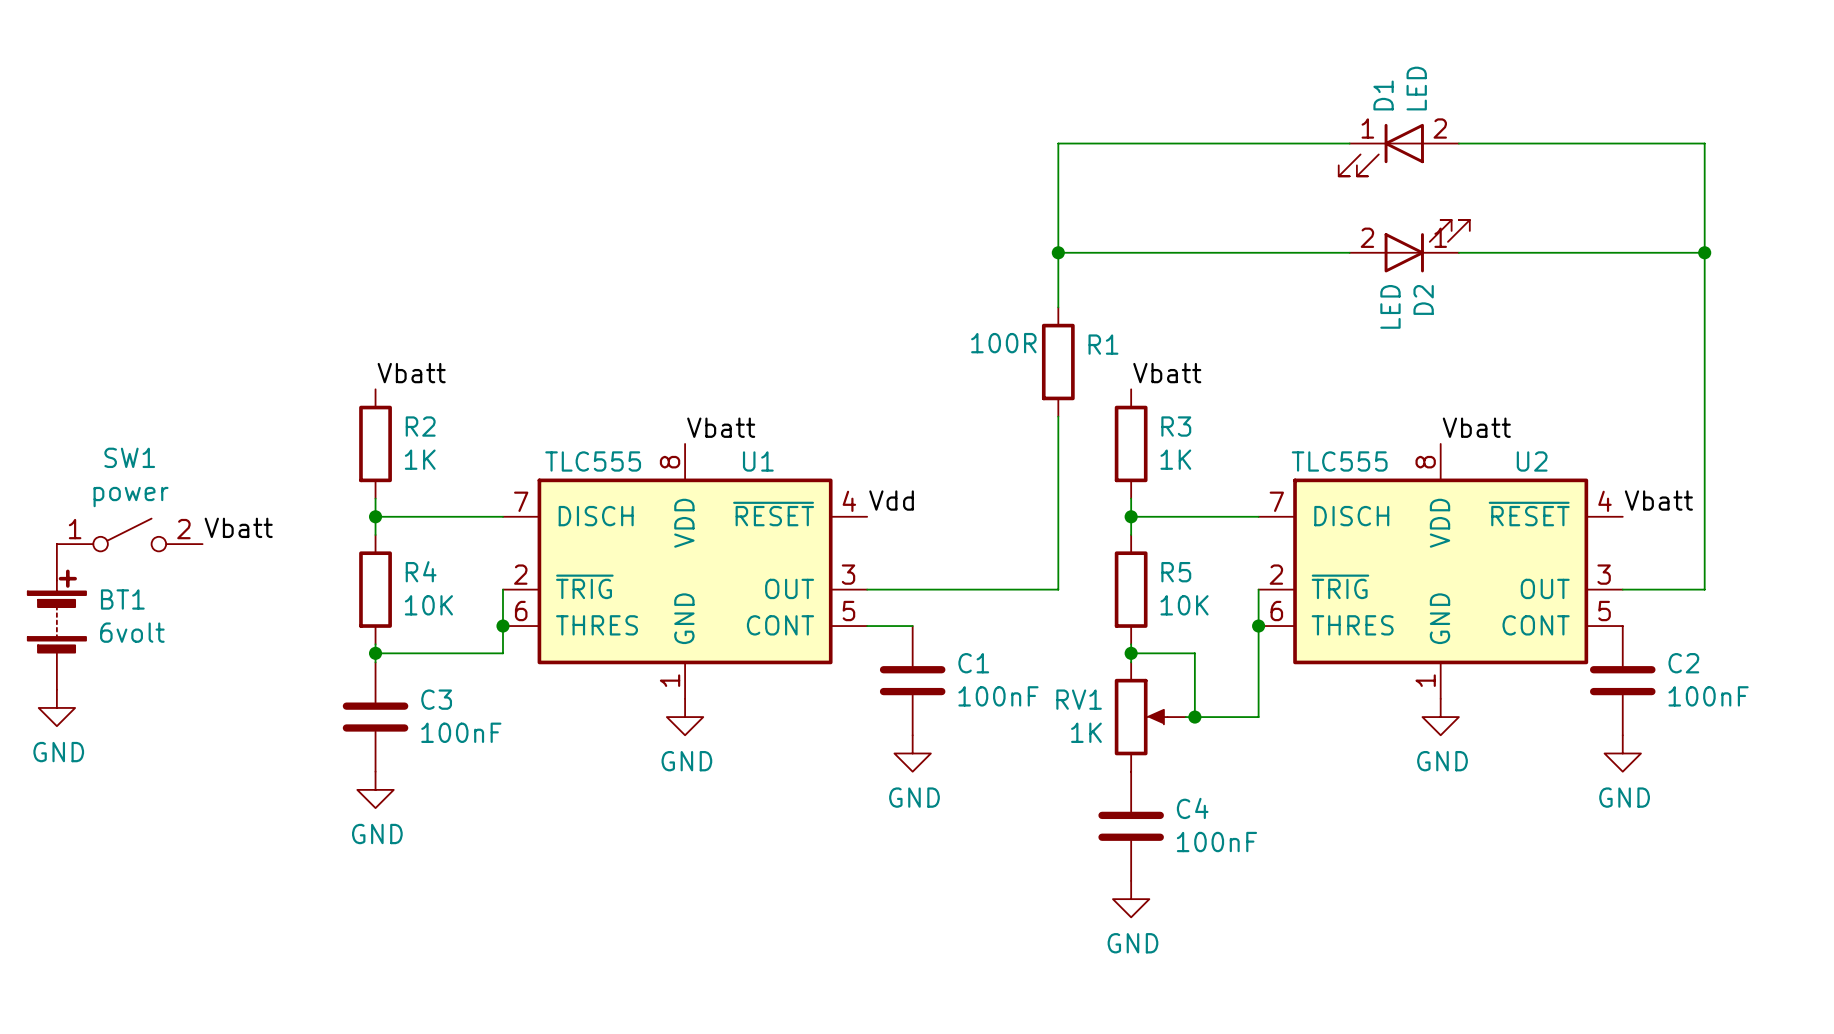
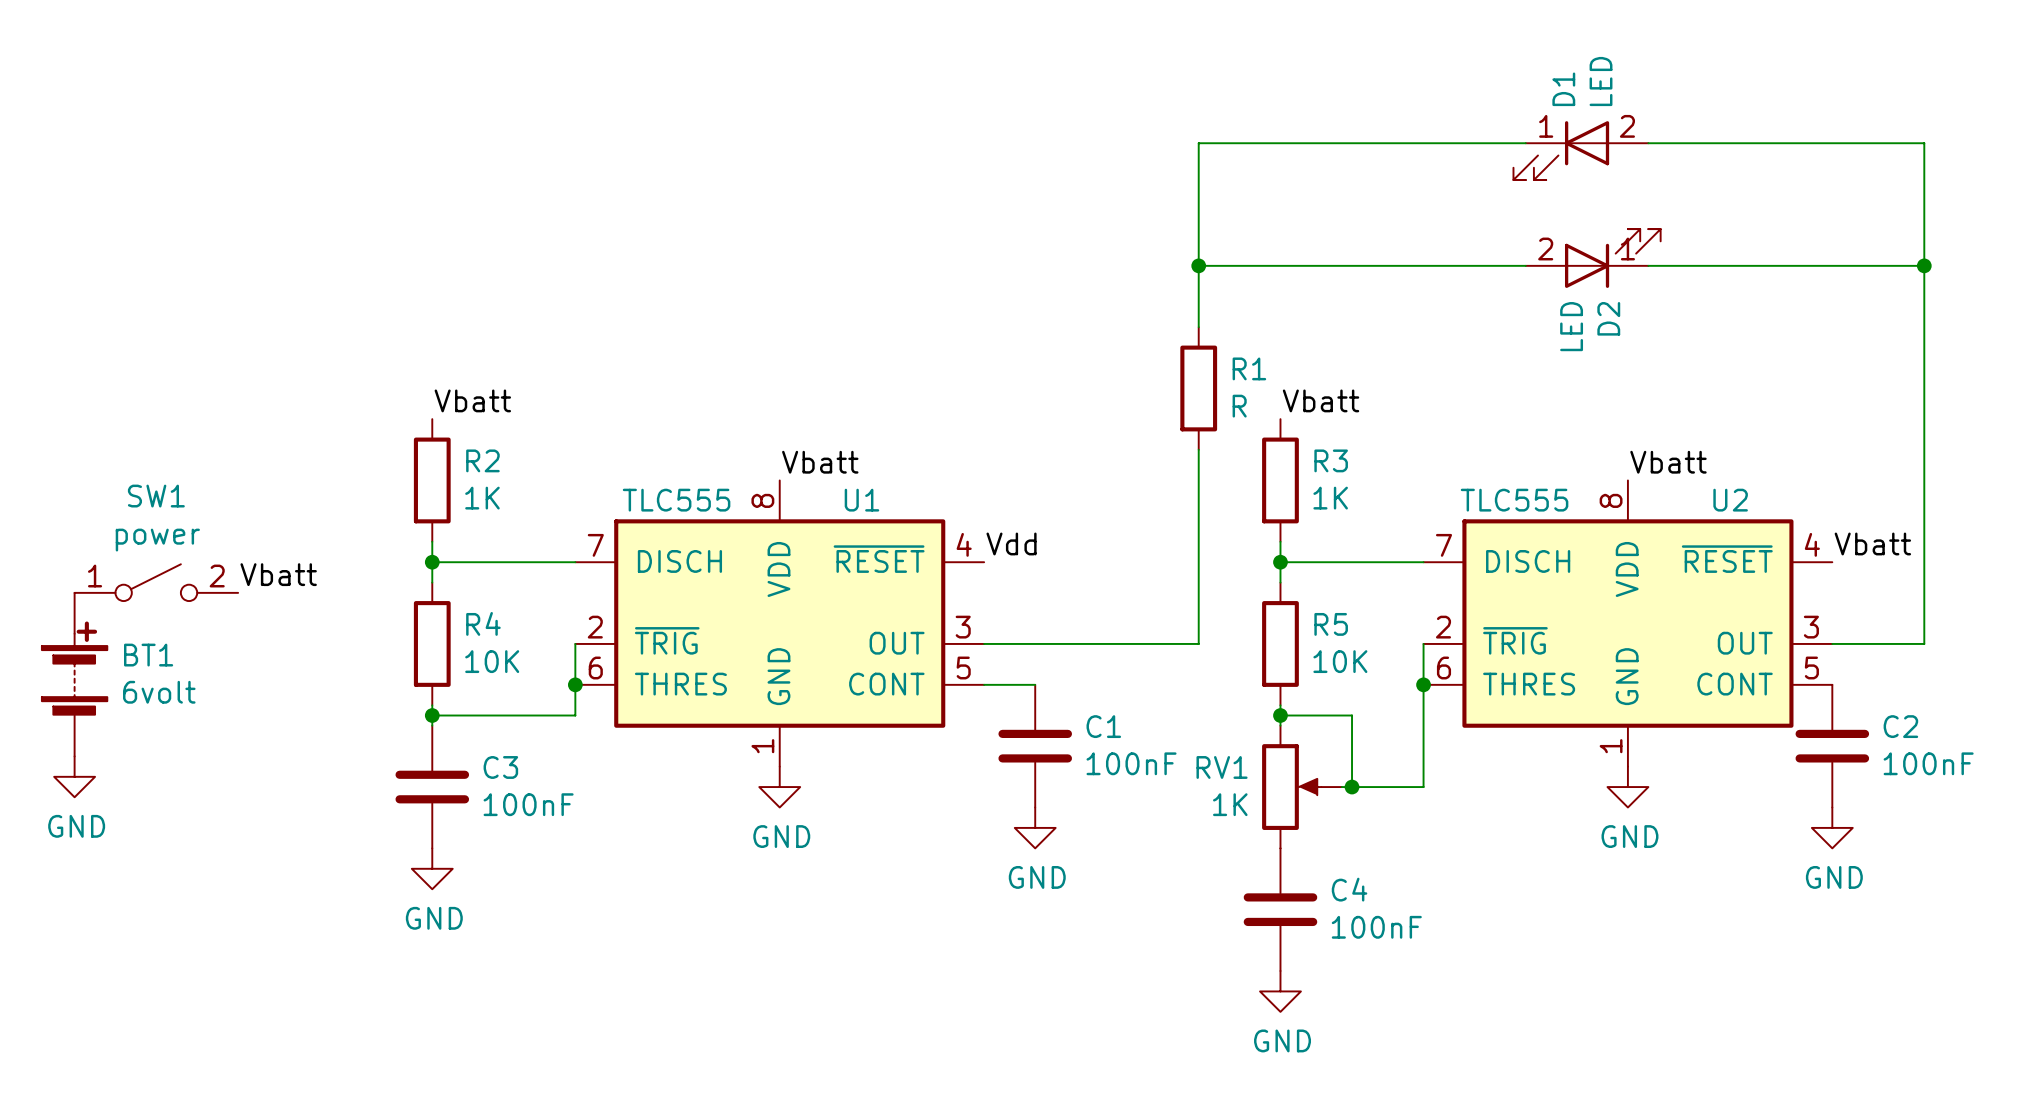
R1 value: 100R (1003, 343) -> R (1239, 406)

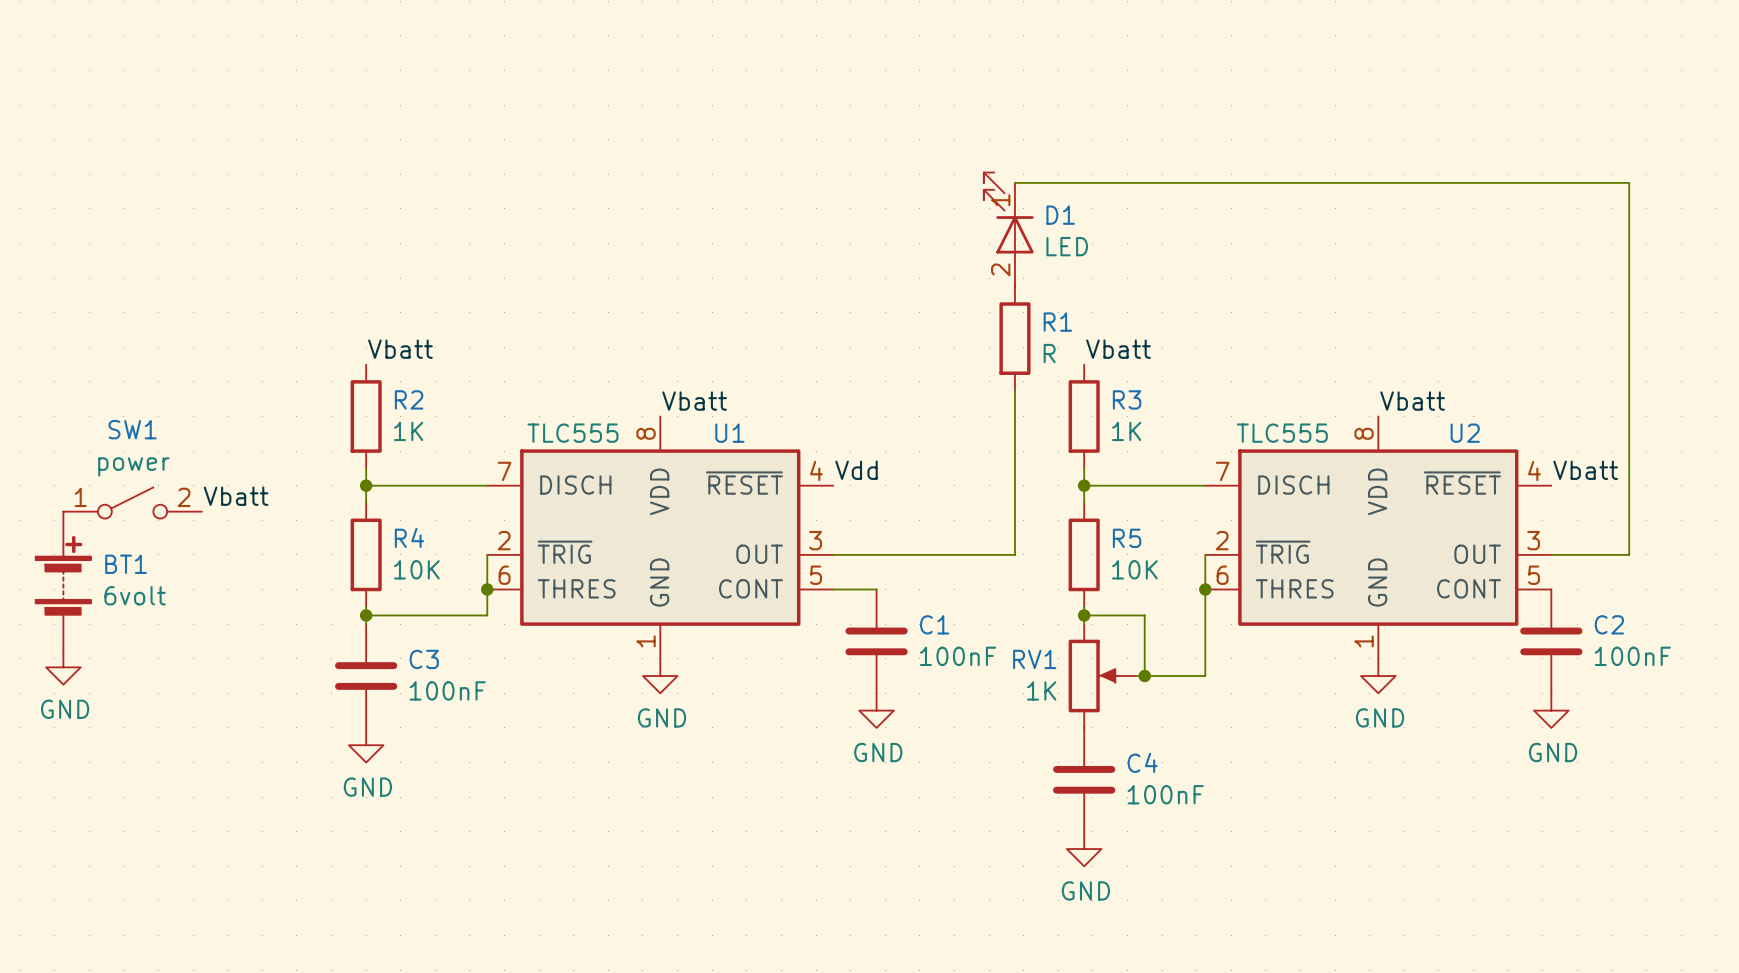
wire: (1525, 143) (1198, 143) (1198, 327) -> none
wire: (1648, 143) (1924, 143) (1924, 204) -> (1014, 182) (1629, 182)
D1 rotation: 0° (1561, 150) -> 90° clockwise (1008, 213)
D1 position: (1580, 150) -> (1008, 229)
D2: LED (1593, 258) -> none
wire: (1198, 265) (1525, 265) -> none
junction: (1198, 265) -> none
wire: (1648, 265) (1924, 265) -> none
junction: (1924, 265) -> none

